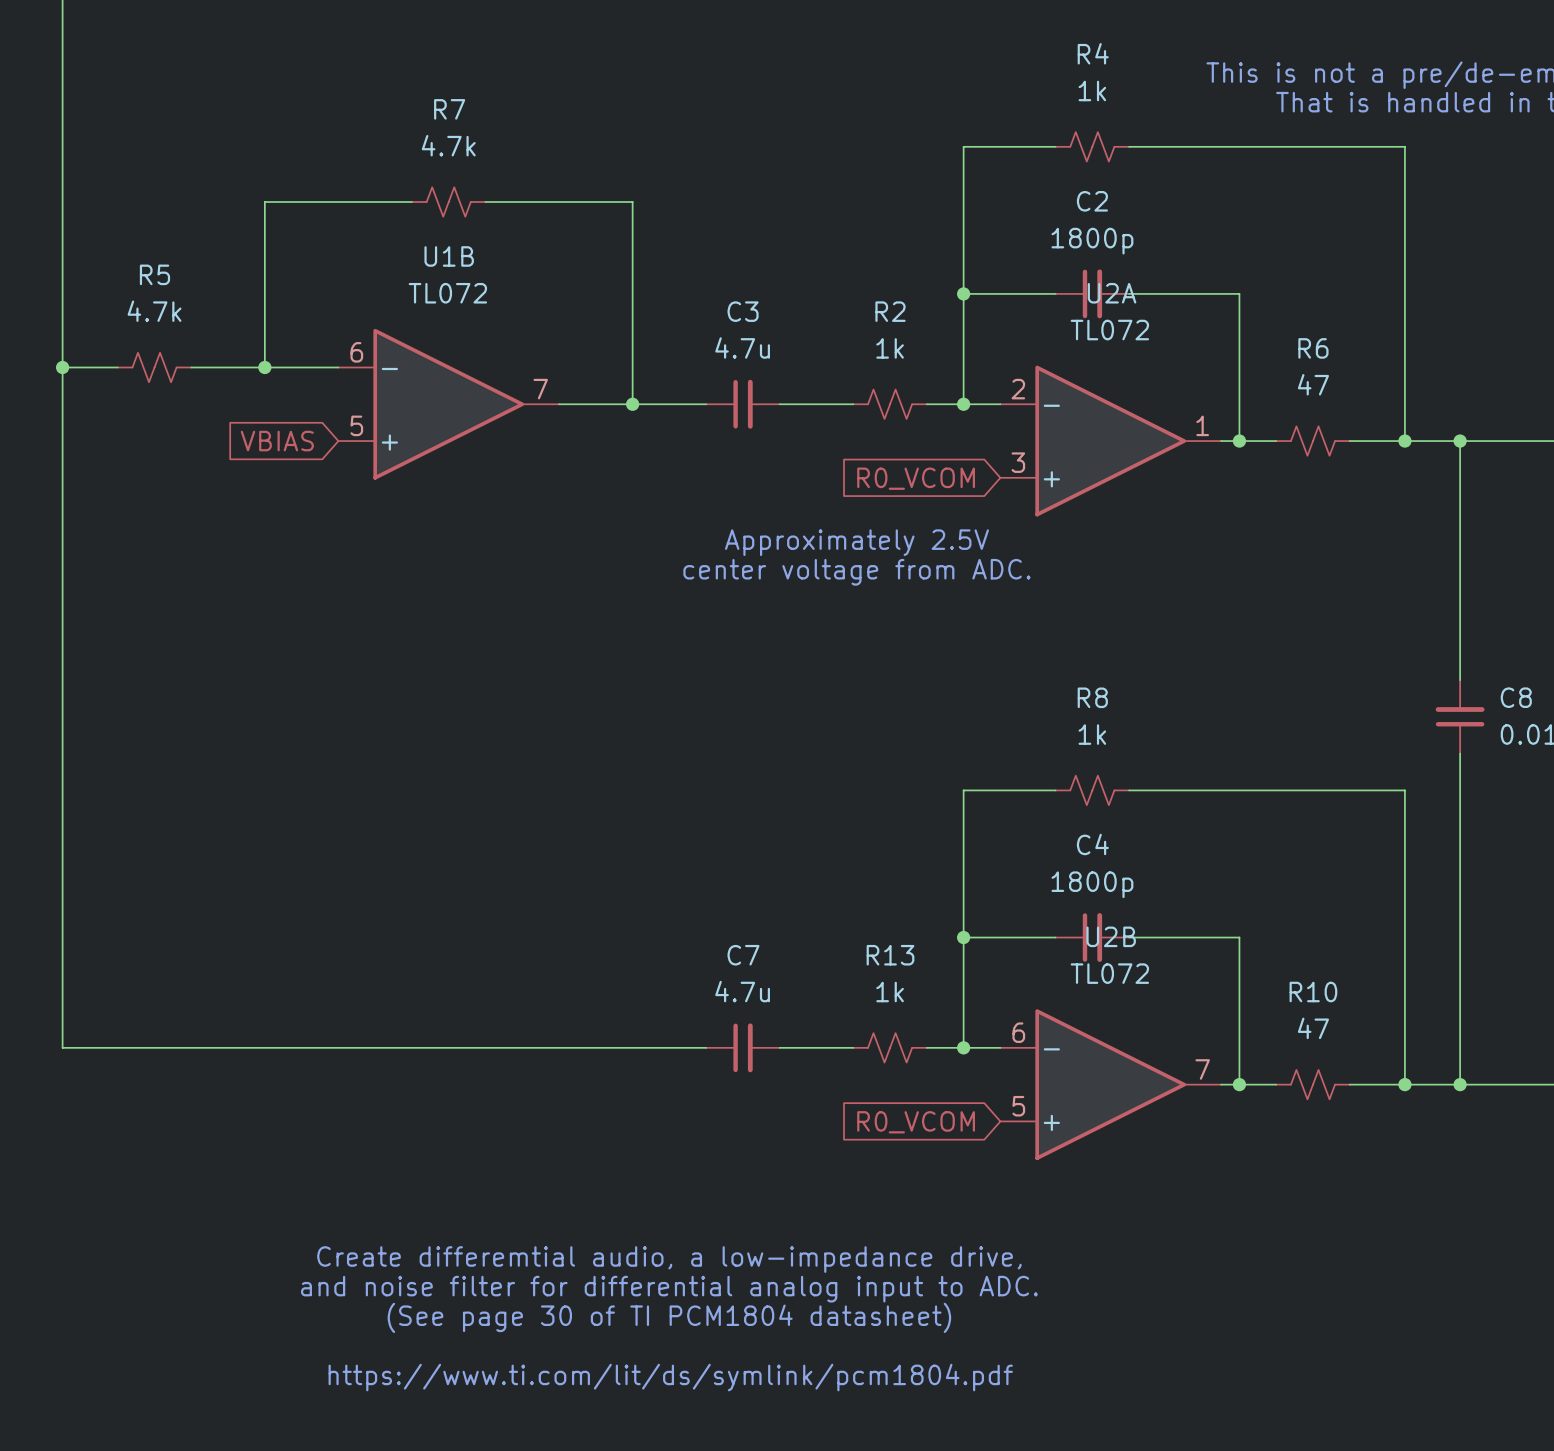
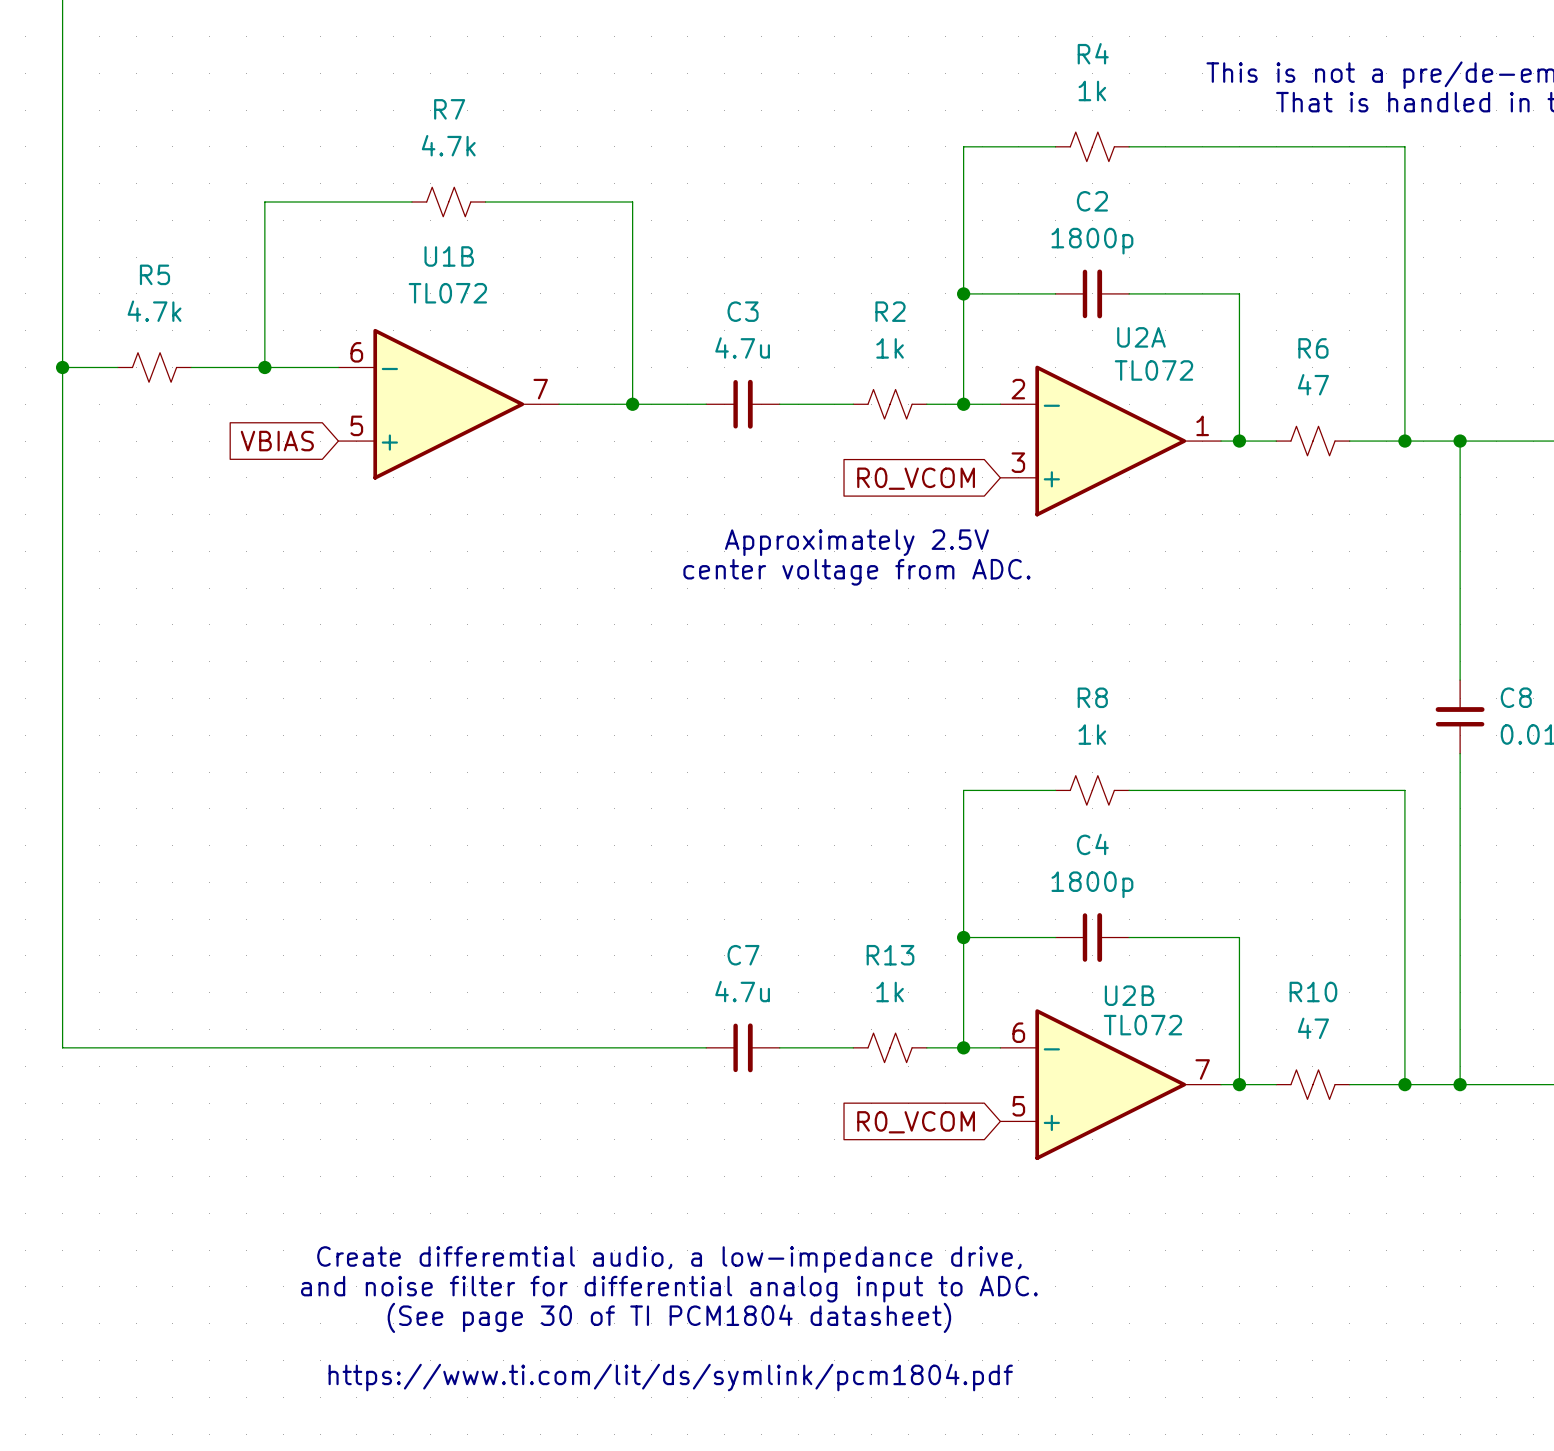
U2A name position: U2A (1112, 293) -> U2A (1141, 337)
U2A value position: TL072 (1109, 330) -> TL072 (1153, 370)
U2B name position: U2B (1111, 936) -> U2B (1129, 995)
U2B value position: TL072 (1109, 973) -> TL072 (1142, 1025)

